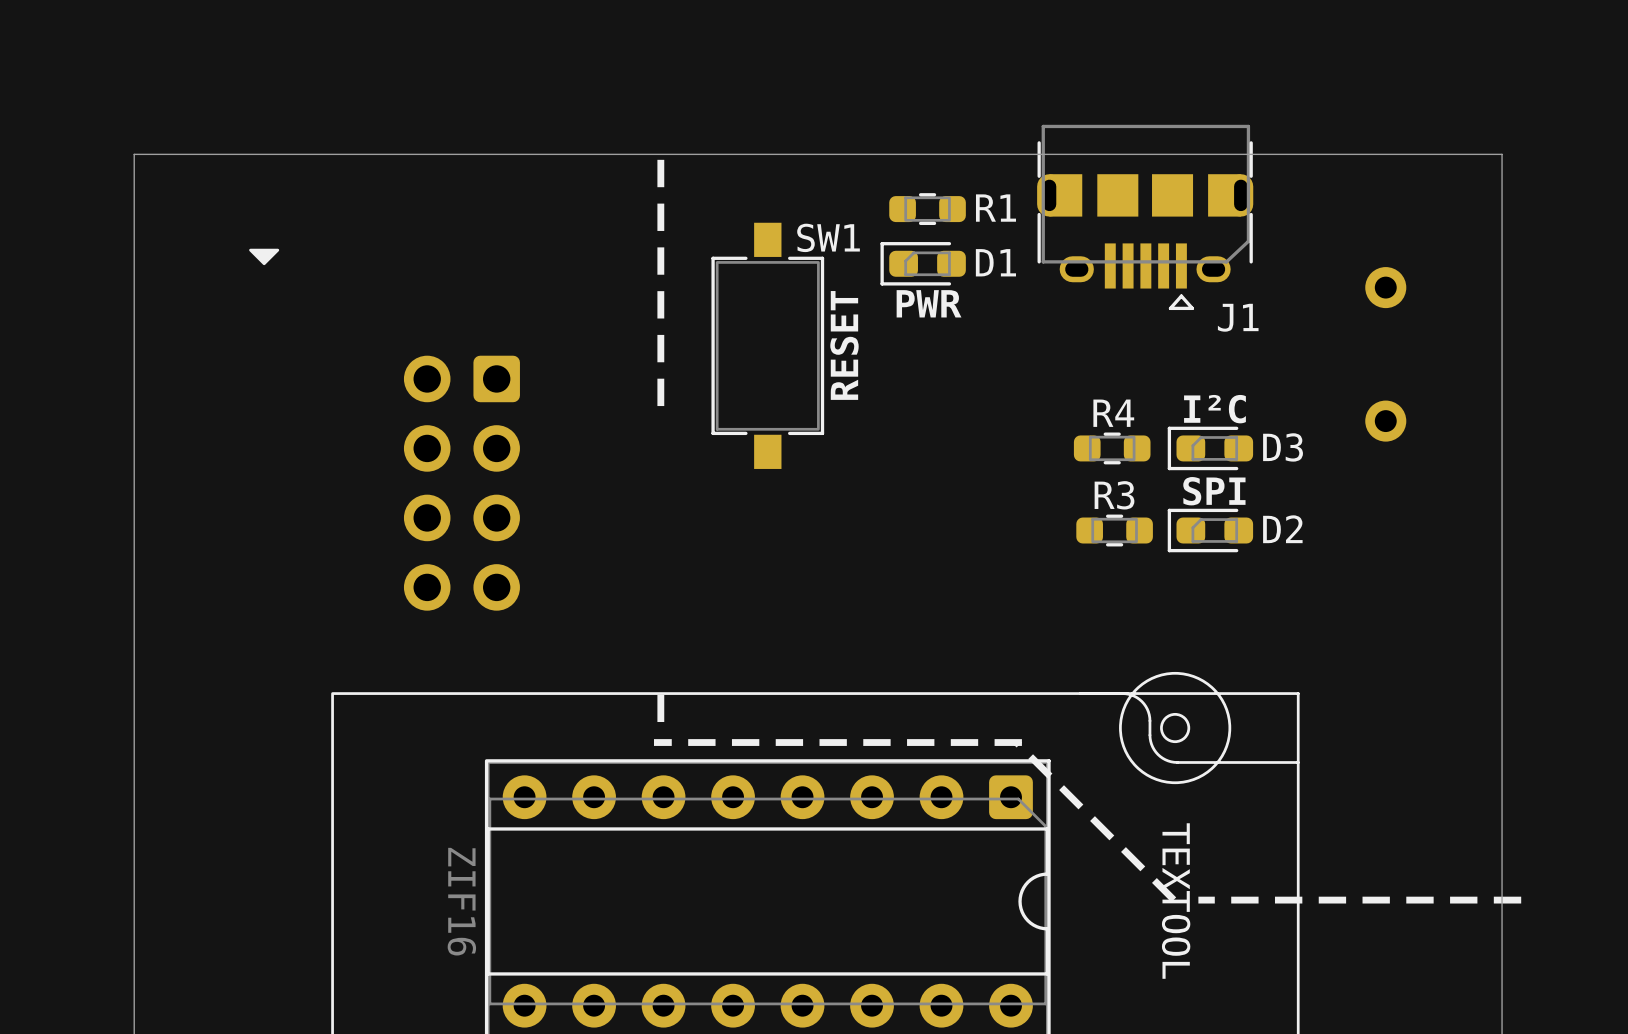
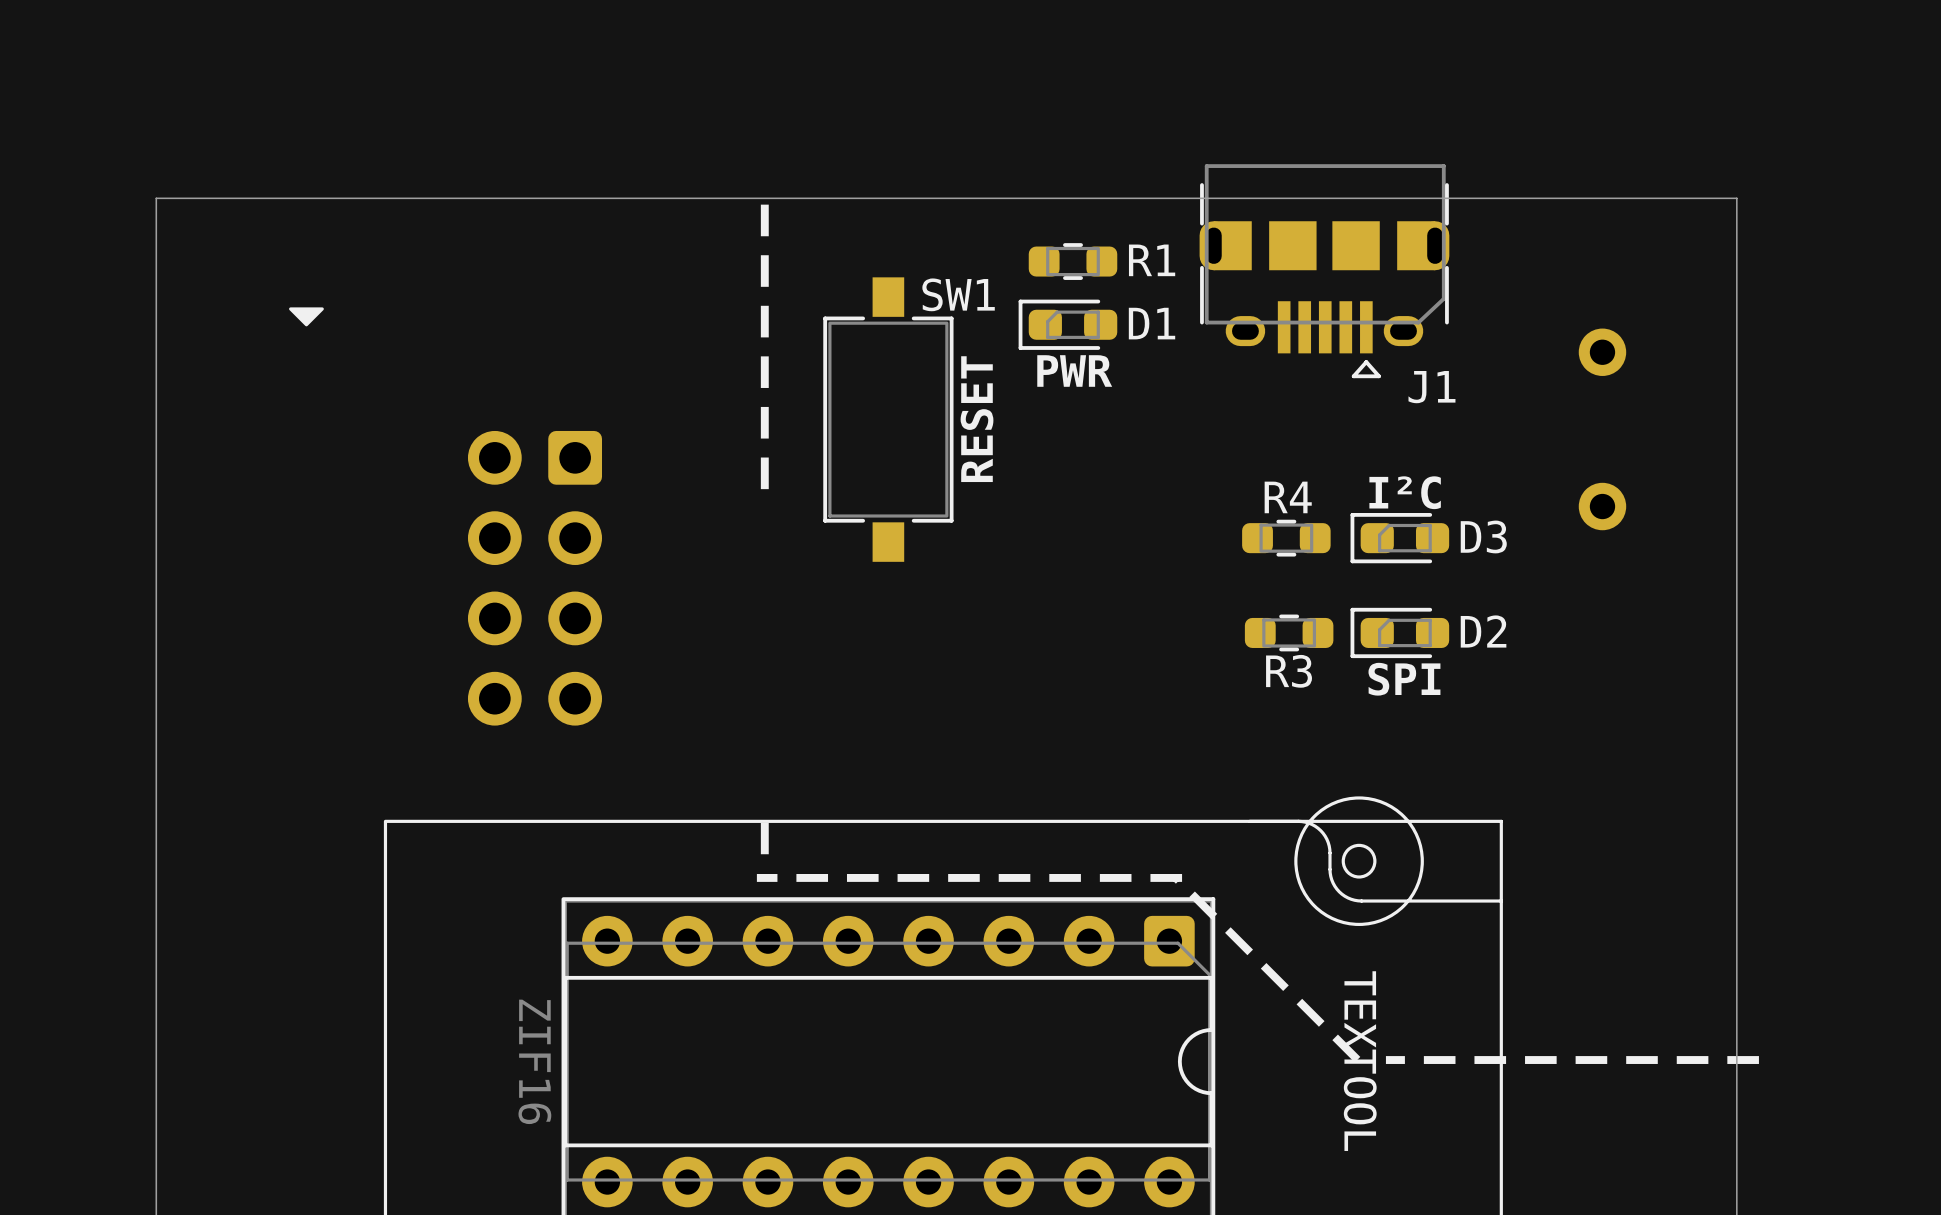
D2 value position: SPI (1214, 491) -> SPI (1404, 679)
R3 name position: R3 (1114, 495) -> R3 (1289, 671)

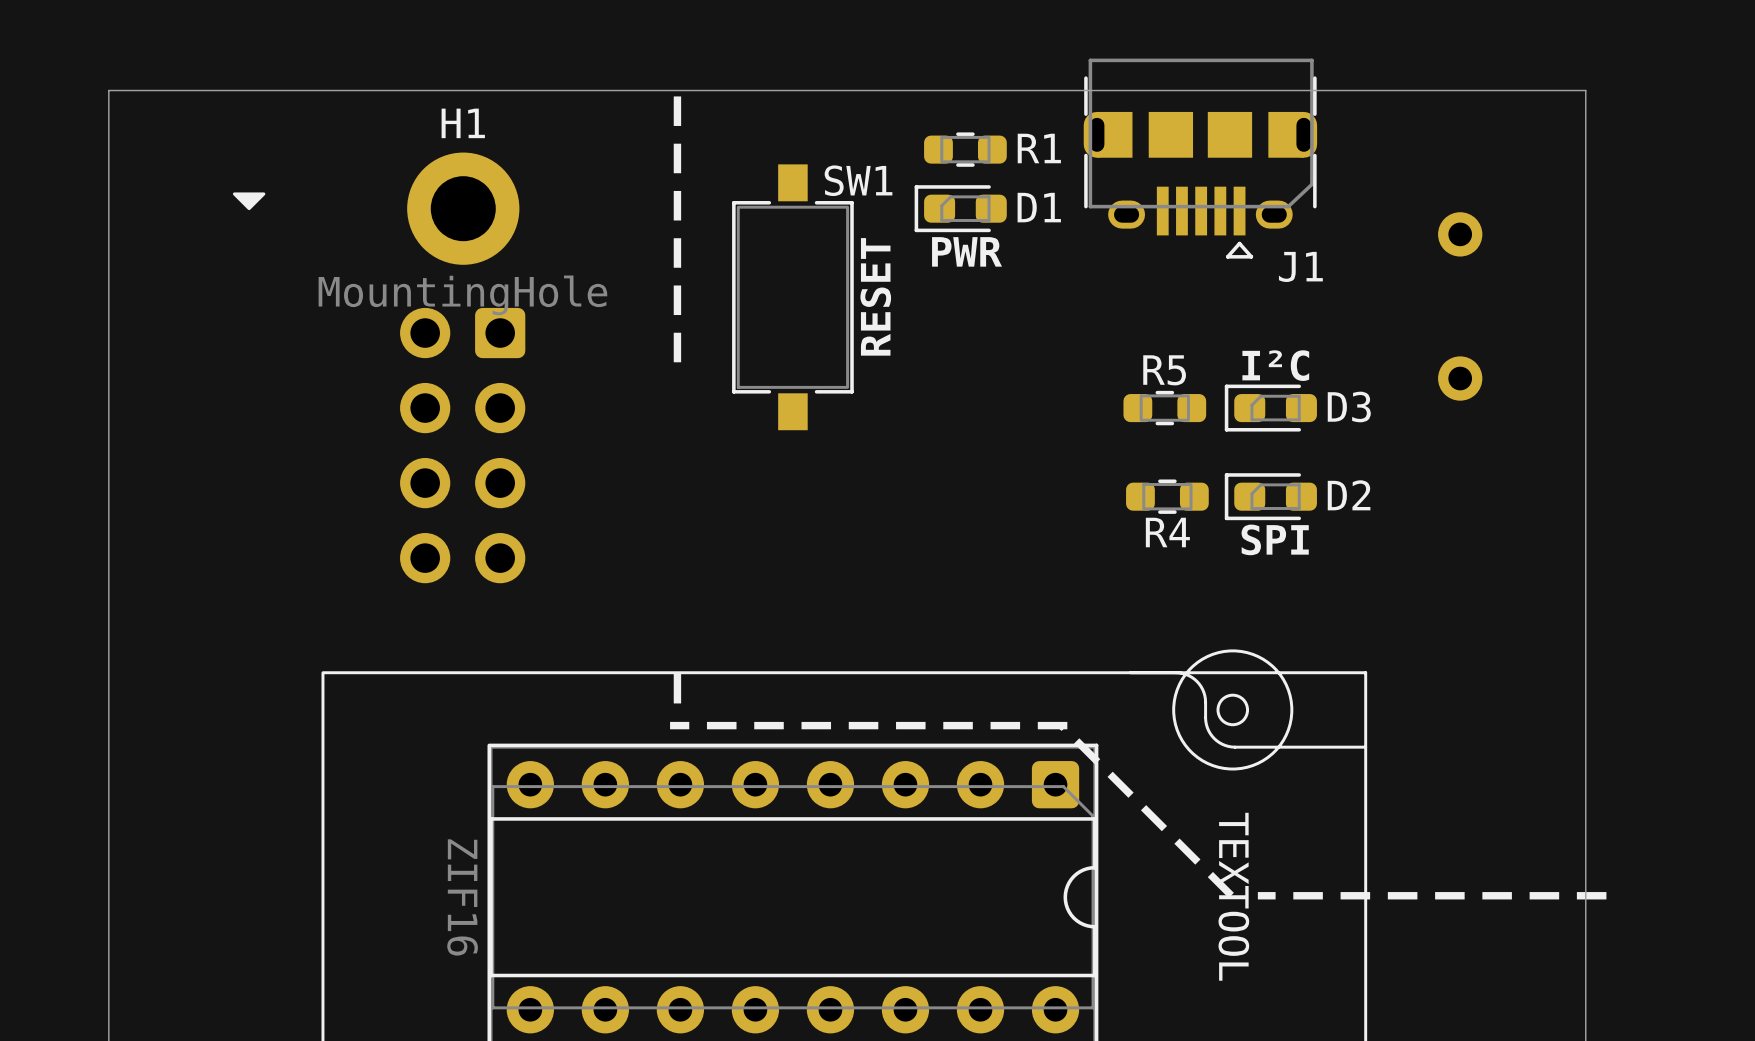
H1: none -> MountingHole (463, 208)
R4 name: R4 (1288, 497) -> R5 (1164, 370)
R3 name: R3 (1289, 671) -> R4 (1167, 532)

